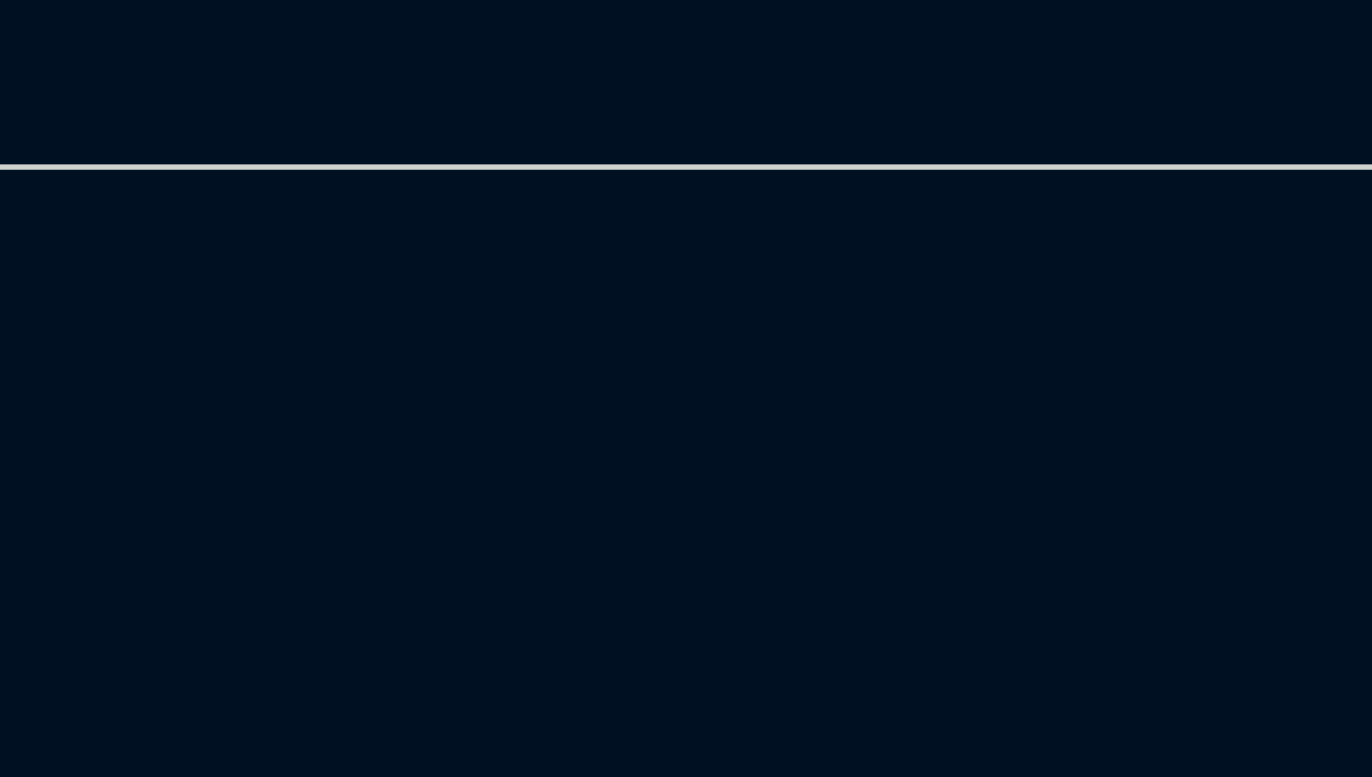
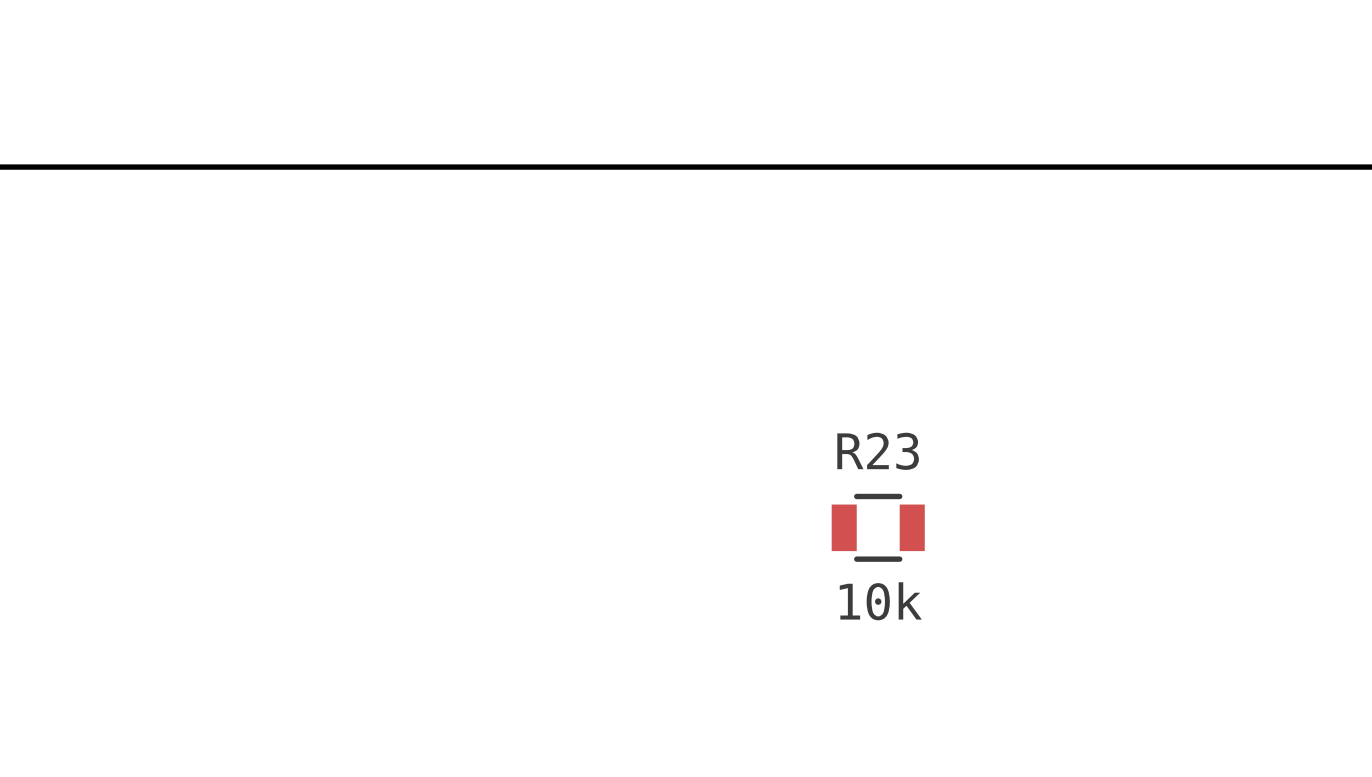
R23: none -> 10k (878, 527)

